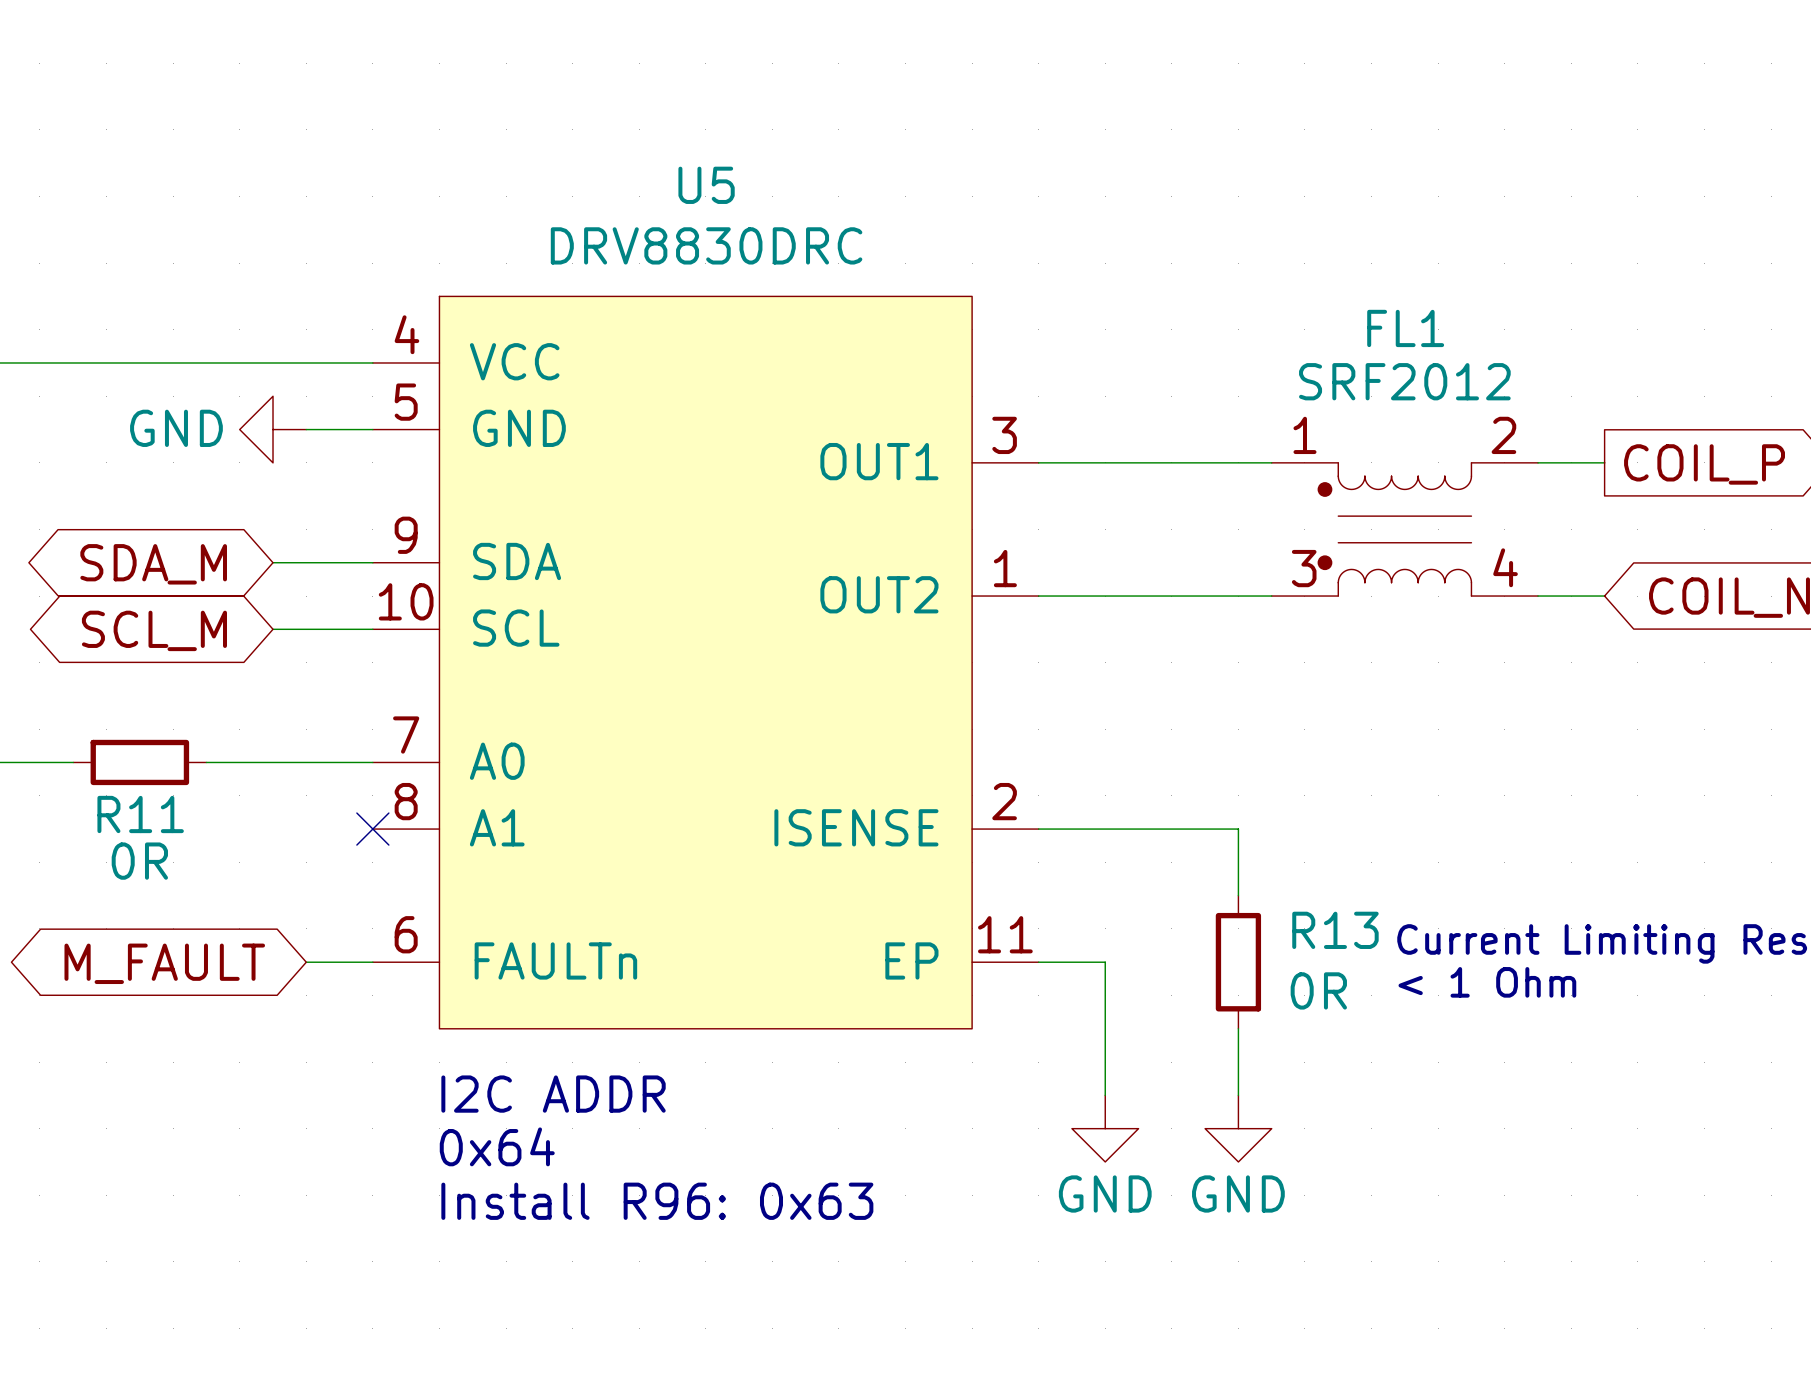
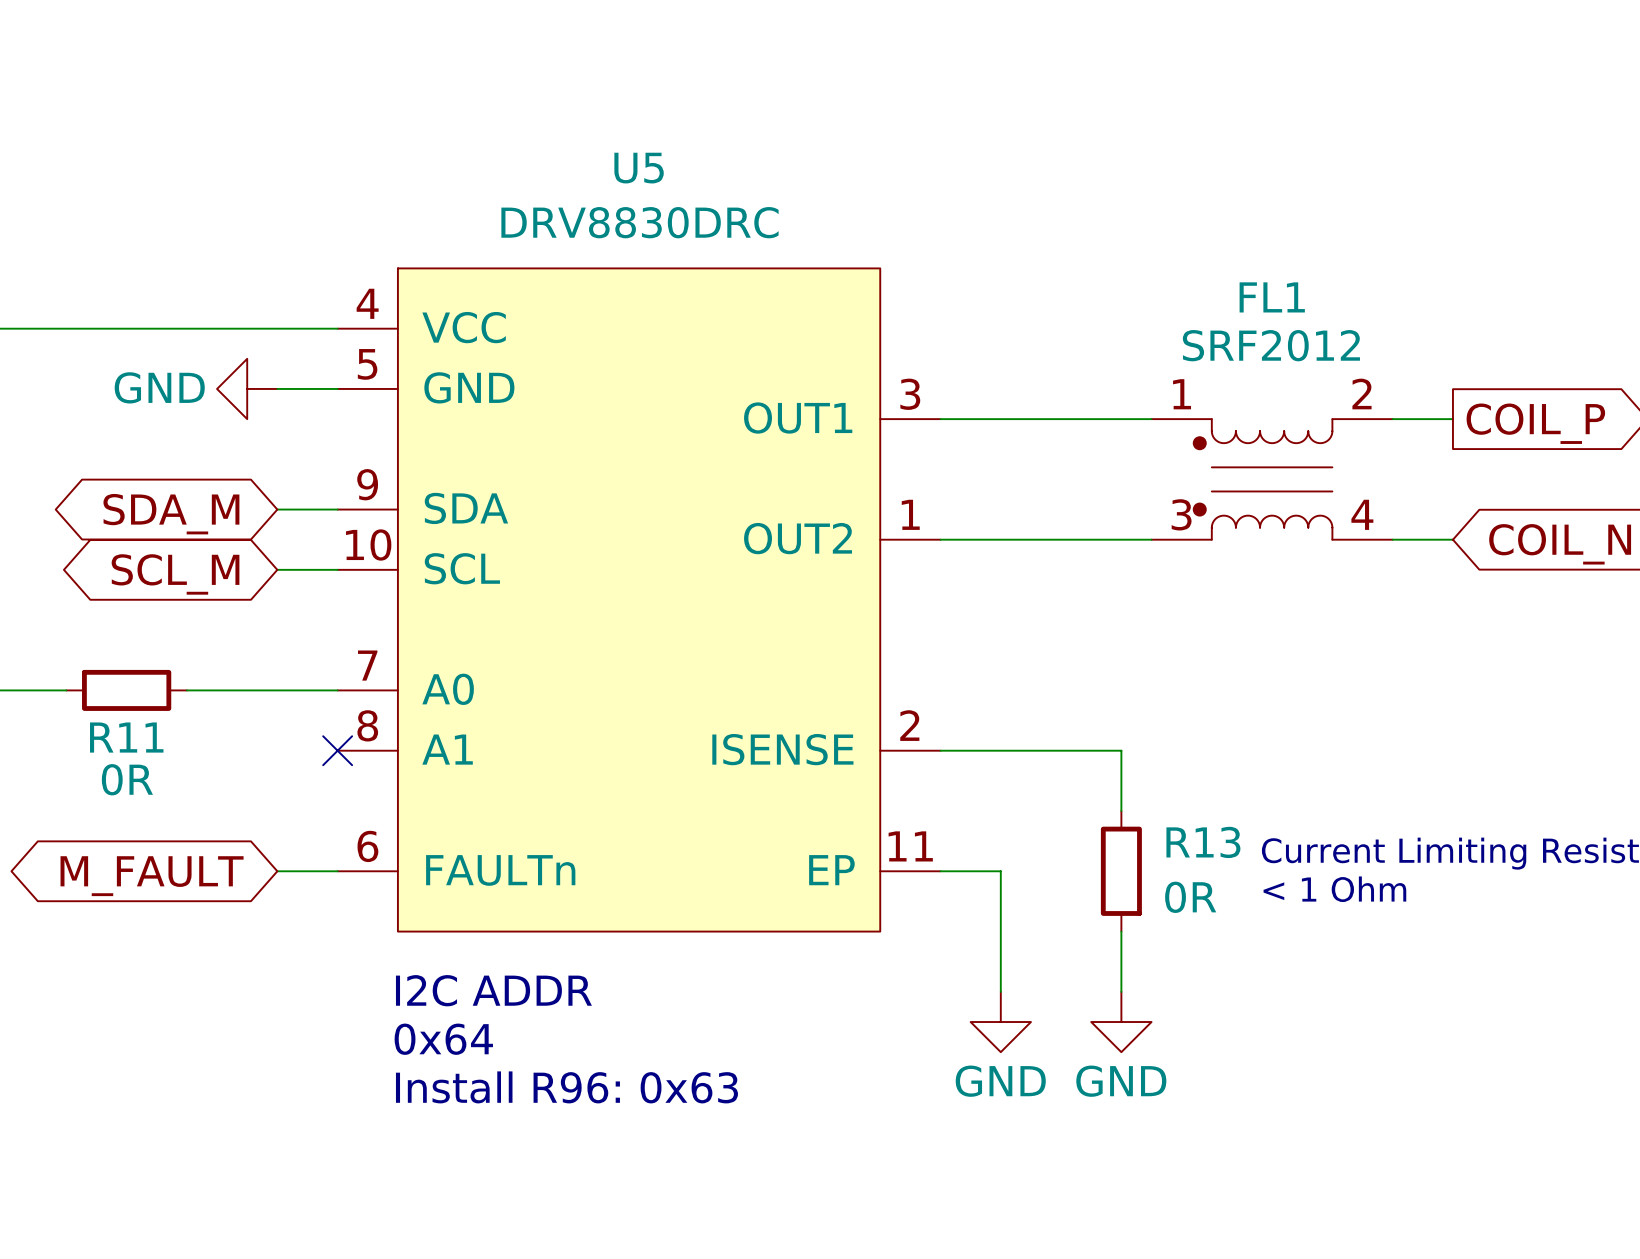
wire: (273, 562) (306, 562) -> none
global label position: SDA_M (153, 564) -> SDA_M (171, 514)
wire: (273, 629) (306, 629) -> none
global label position: SCL_M (154, 630) -> SCL_M (175, 574)

